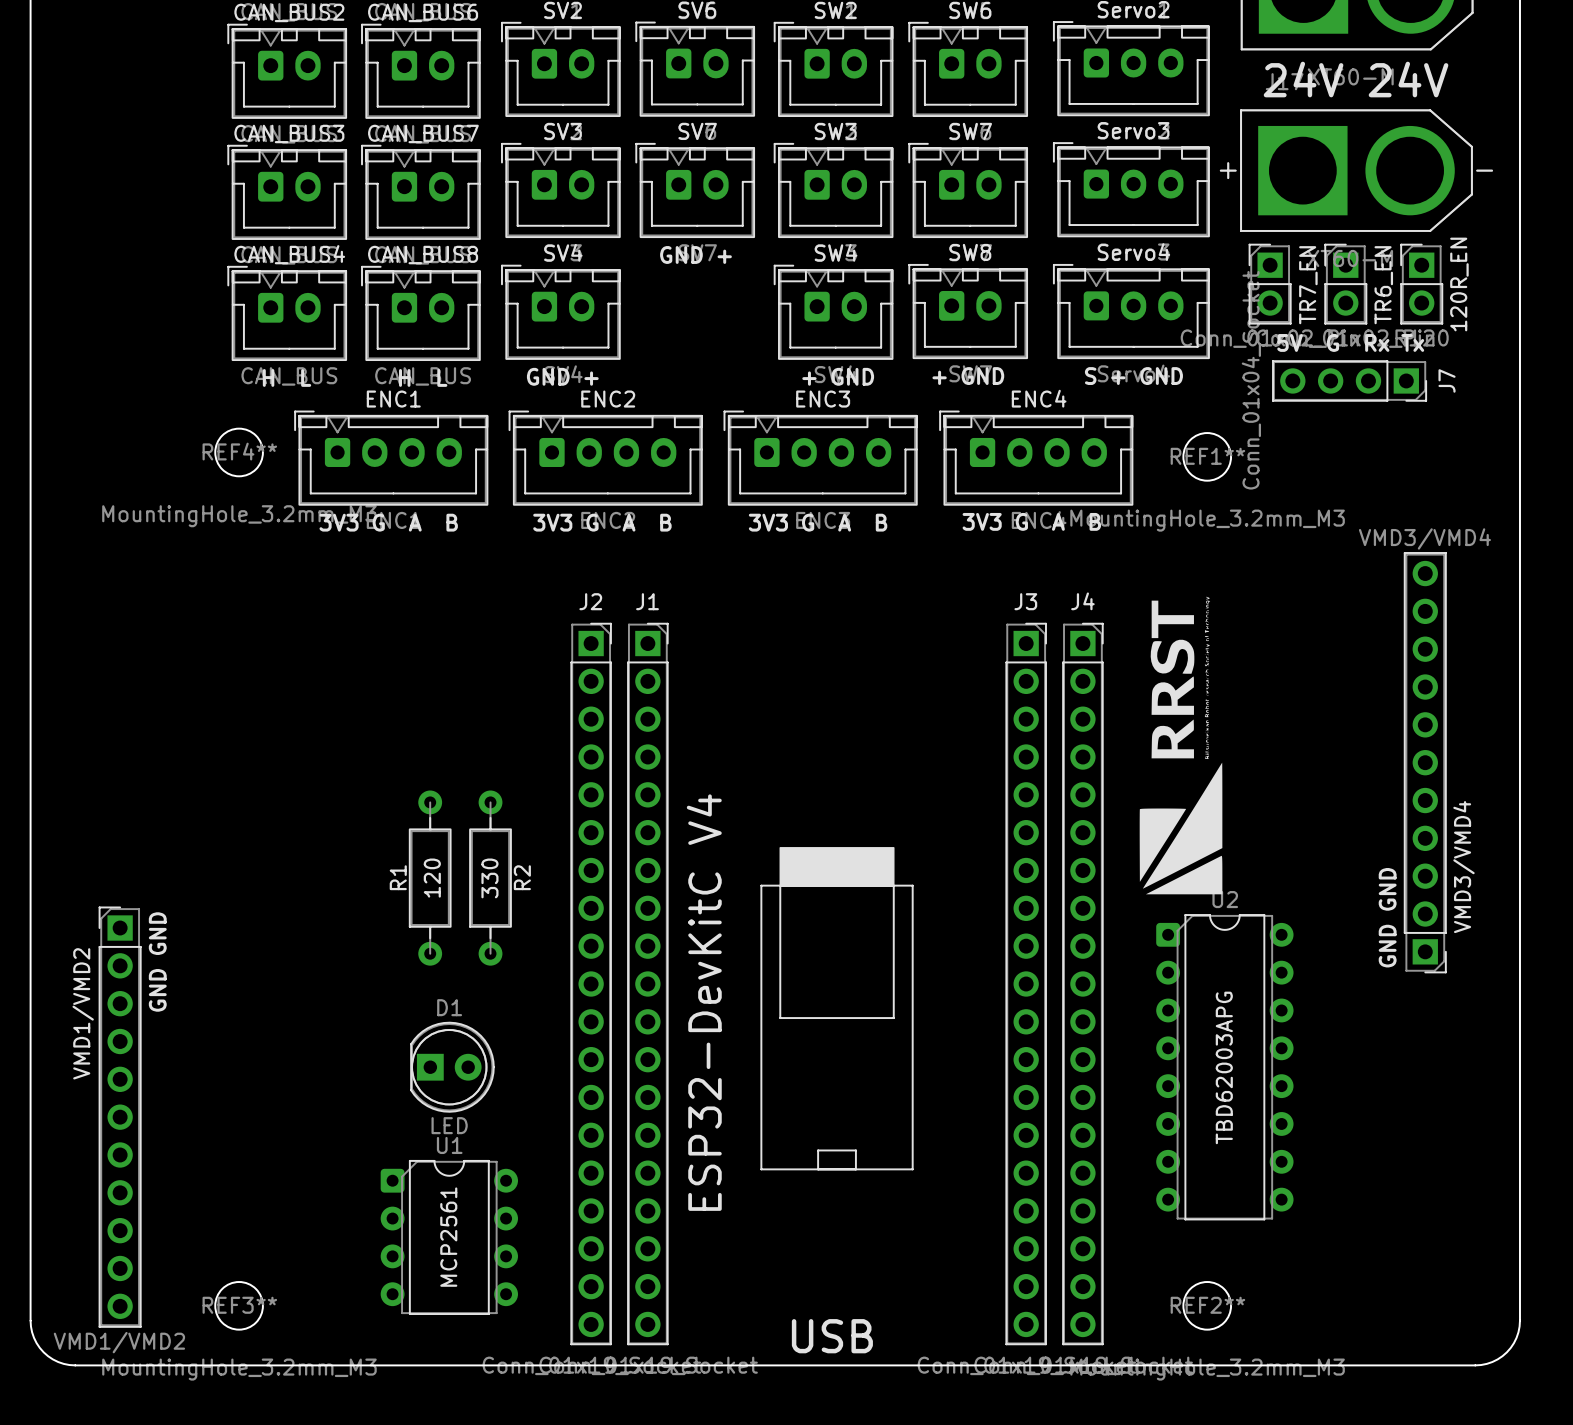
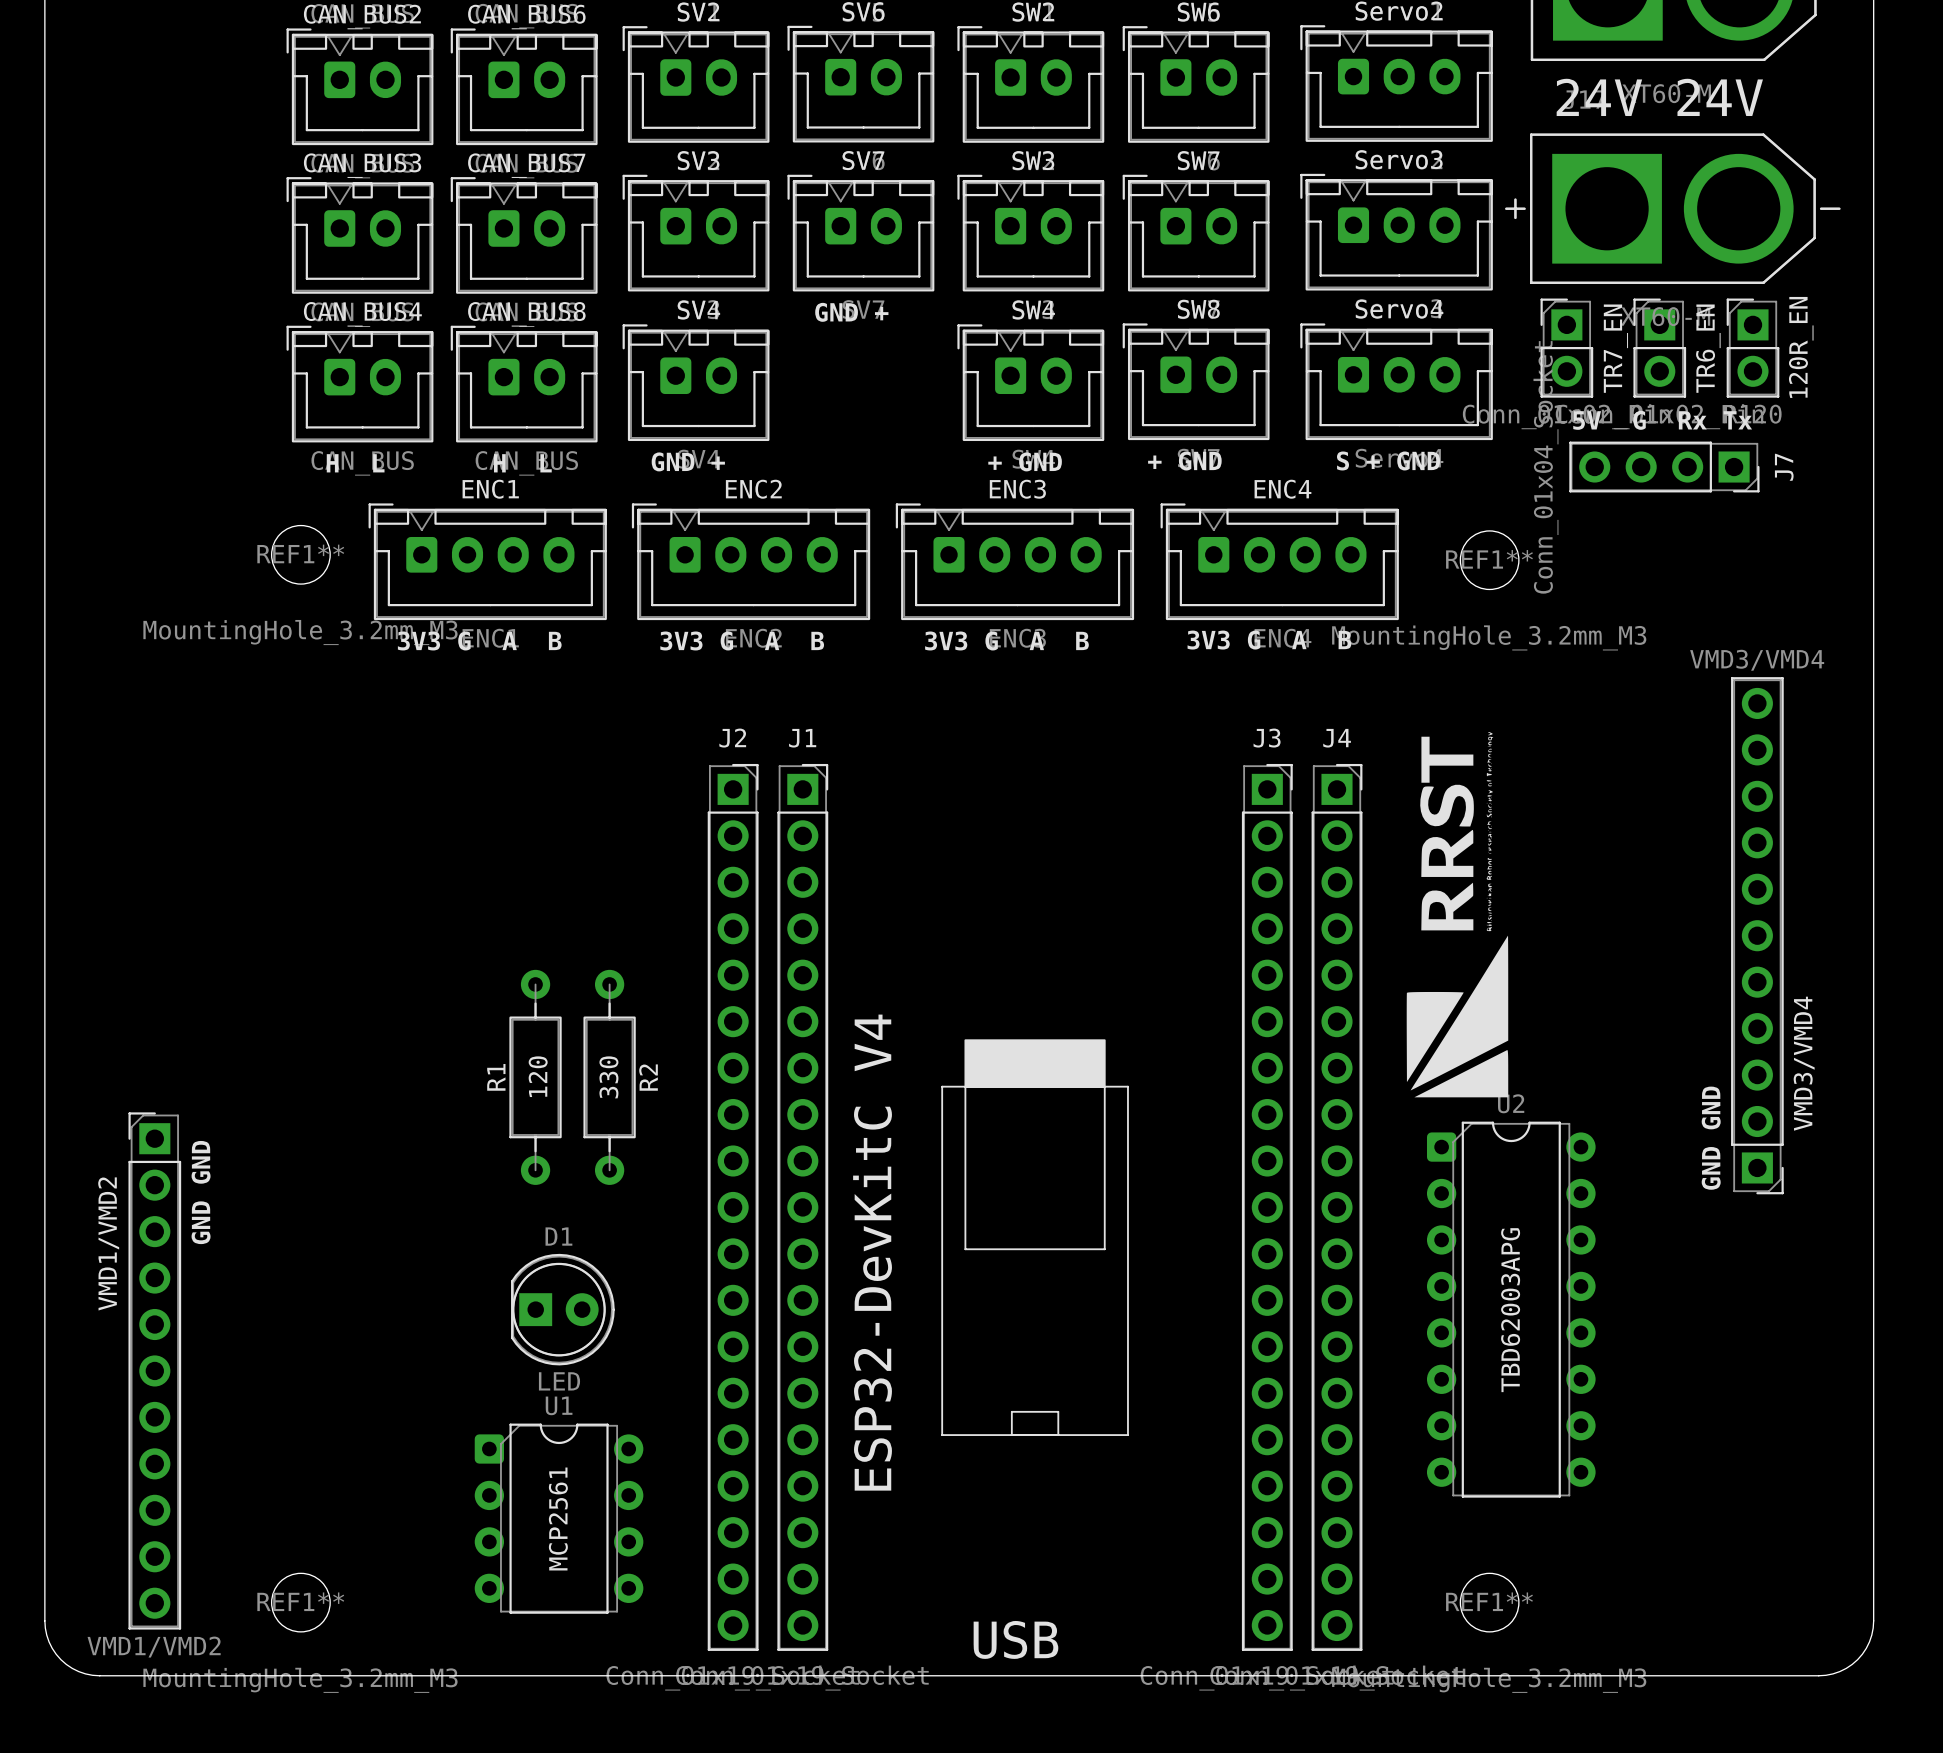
REF4** name: REF4** (239, 451) -> REF1** (300, 553)
REF3** name: REF3** (239, 1305) -> REF1** (300, 1601)
REF2** name: REF2** (1207, 1305) -> REF1** (1489, 1601)

